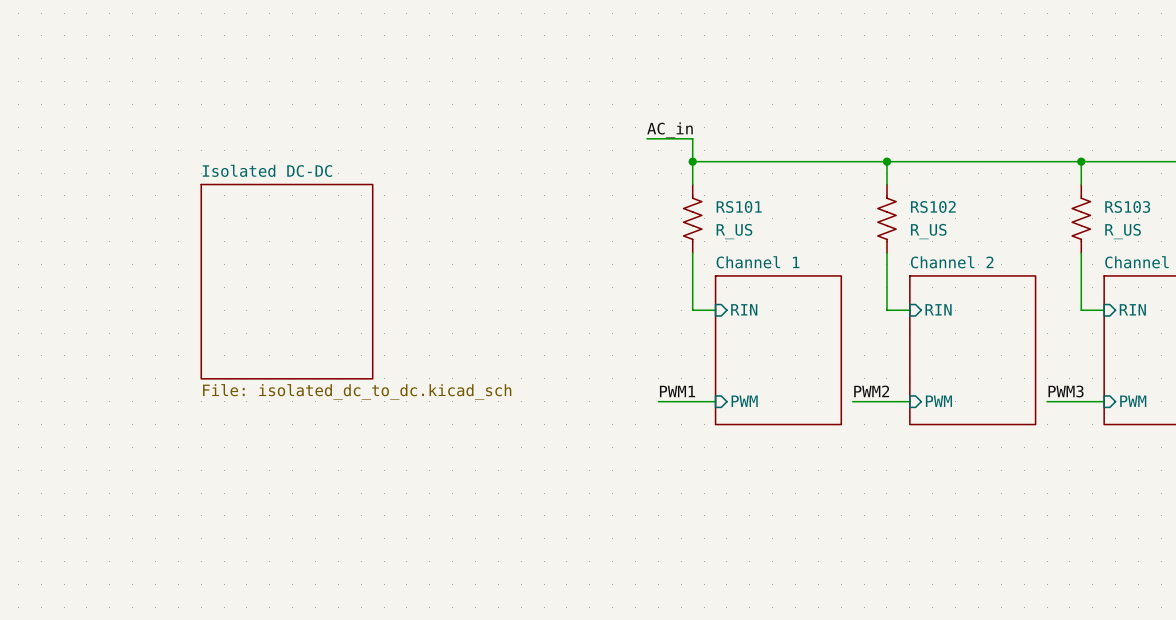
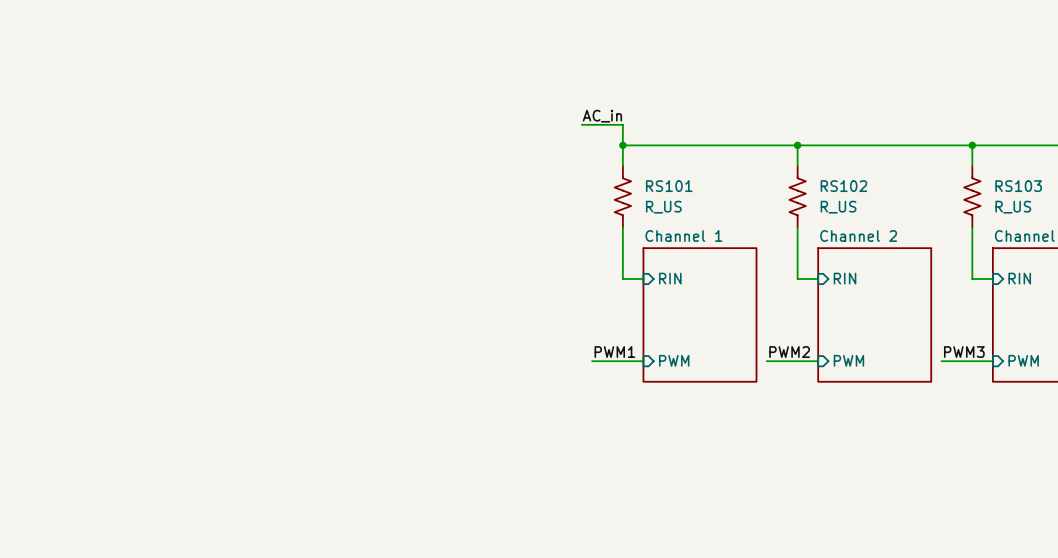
sheet Isolated DC-DC: File: isolated_dc_to_dc.kicad_sch (286, 281) -> none

